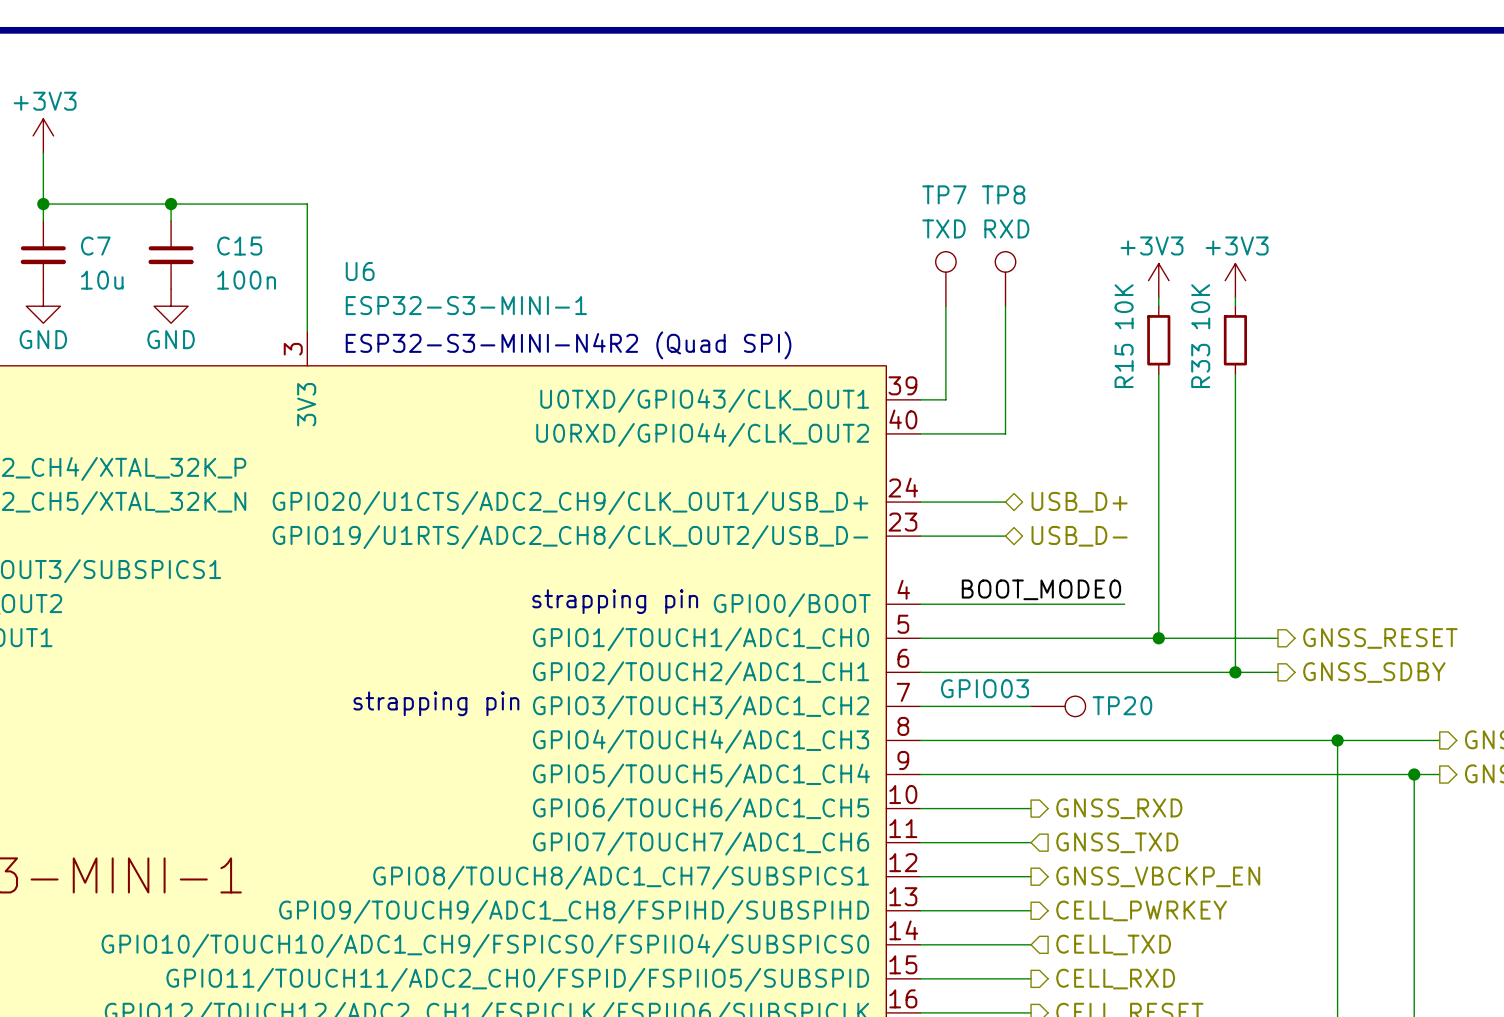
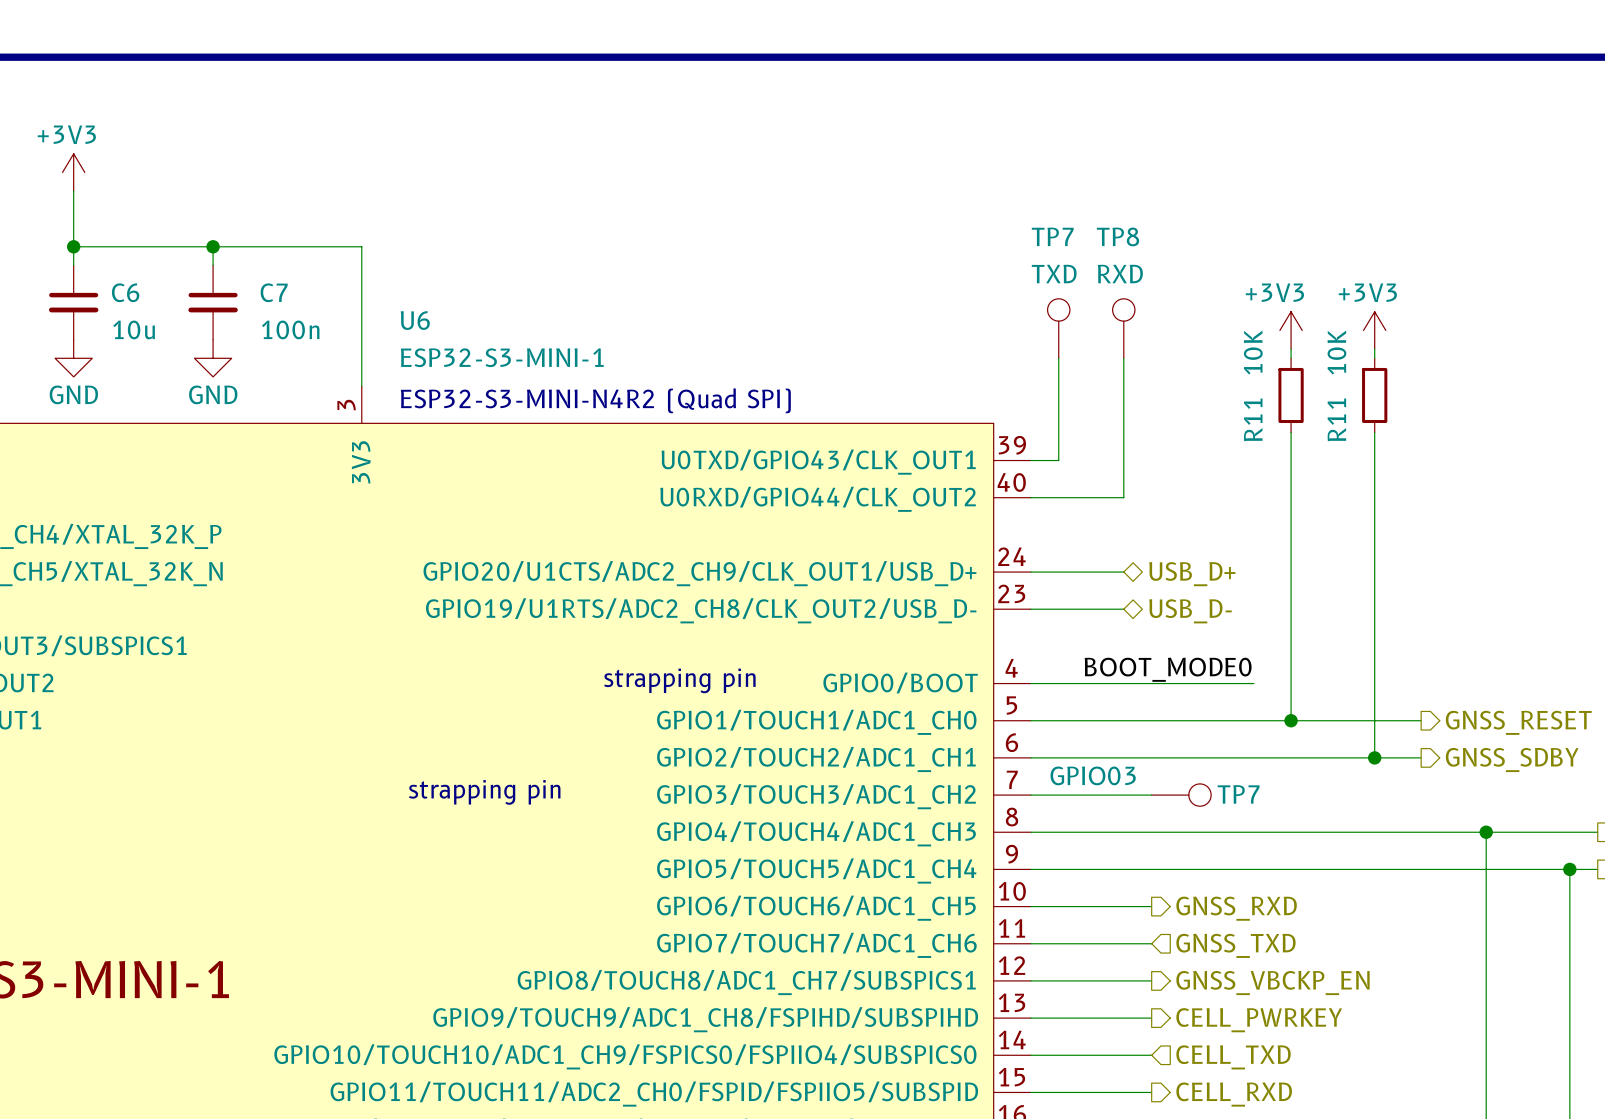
C7 name: C7 (95, 246) -> C6 (125, 292)
C15 name: C15 (239, 246) -> C7 (274, 292)
R15 name: R15 (1124, 365) -> R11 (1253, 419)
R33 name: R33 (1200, 365) -> R11 (1336, 419)
TP20 name: TP20 (1122, 705) -> TP7 (1238, 794)

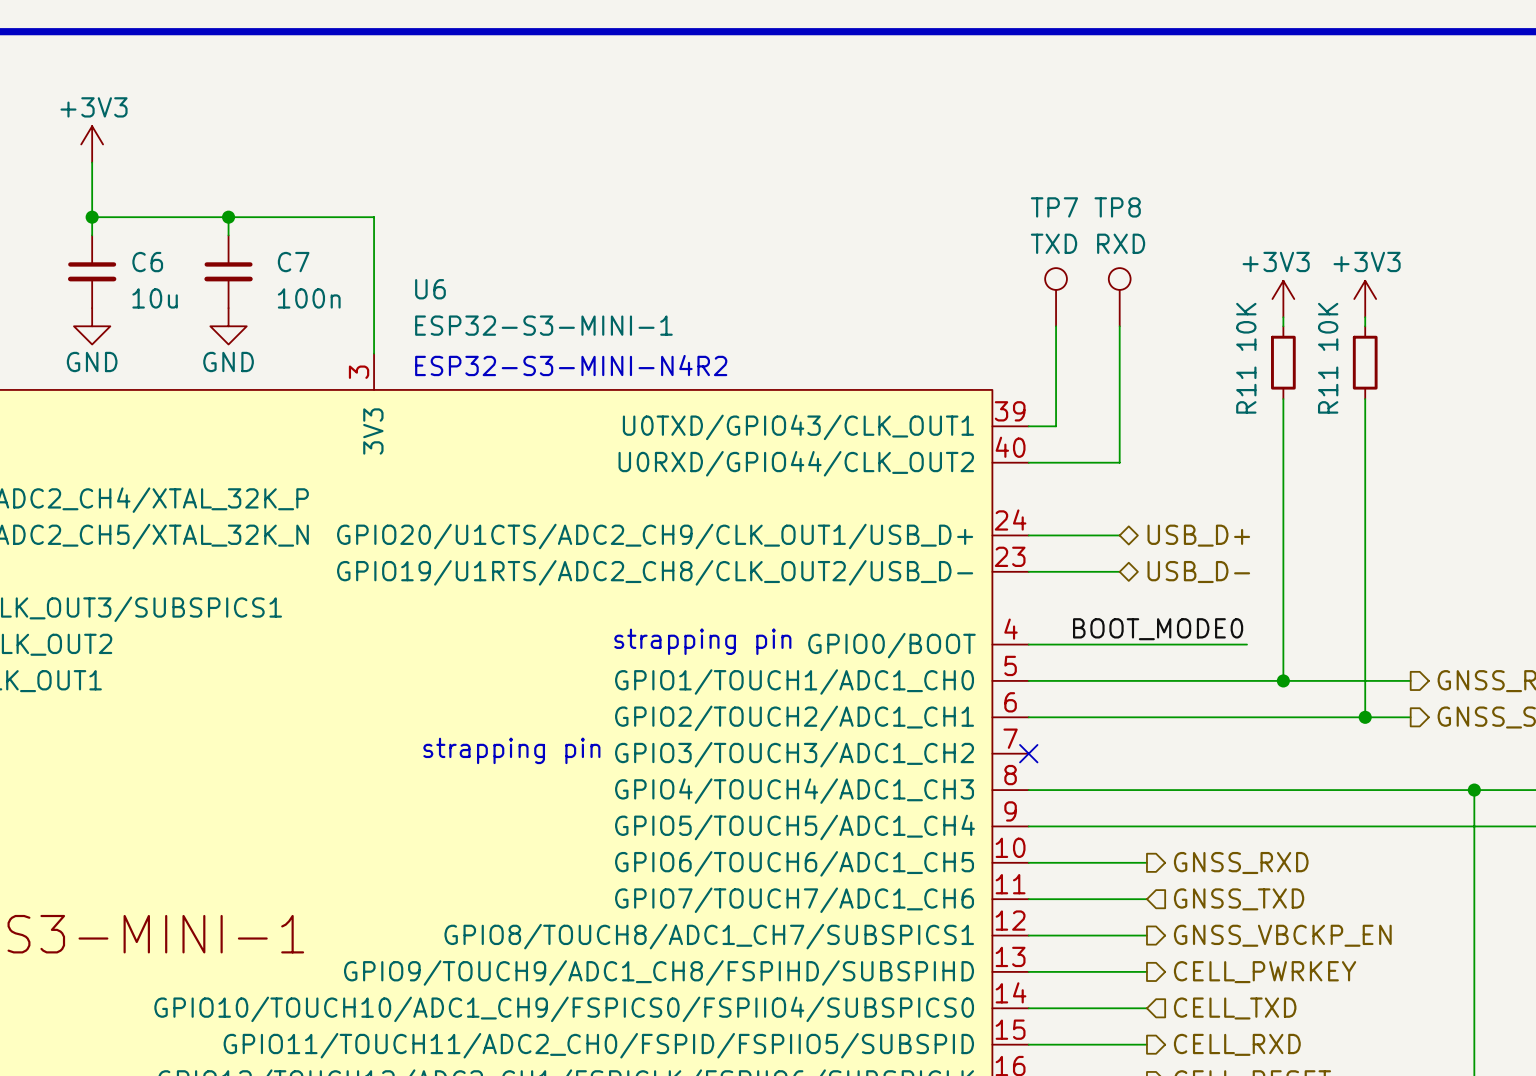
text: ESP32-S3-MINI-N4R2 (Quad SPI) (595, 400) -> ESP32-S3-MINI-N4R2 (571, 365)
wire: (1030, 795) (1151, 795) -> none
no-connect mark: none -> (1028, 753)
TP7: GPIO03 (1181, 795) -> none

